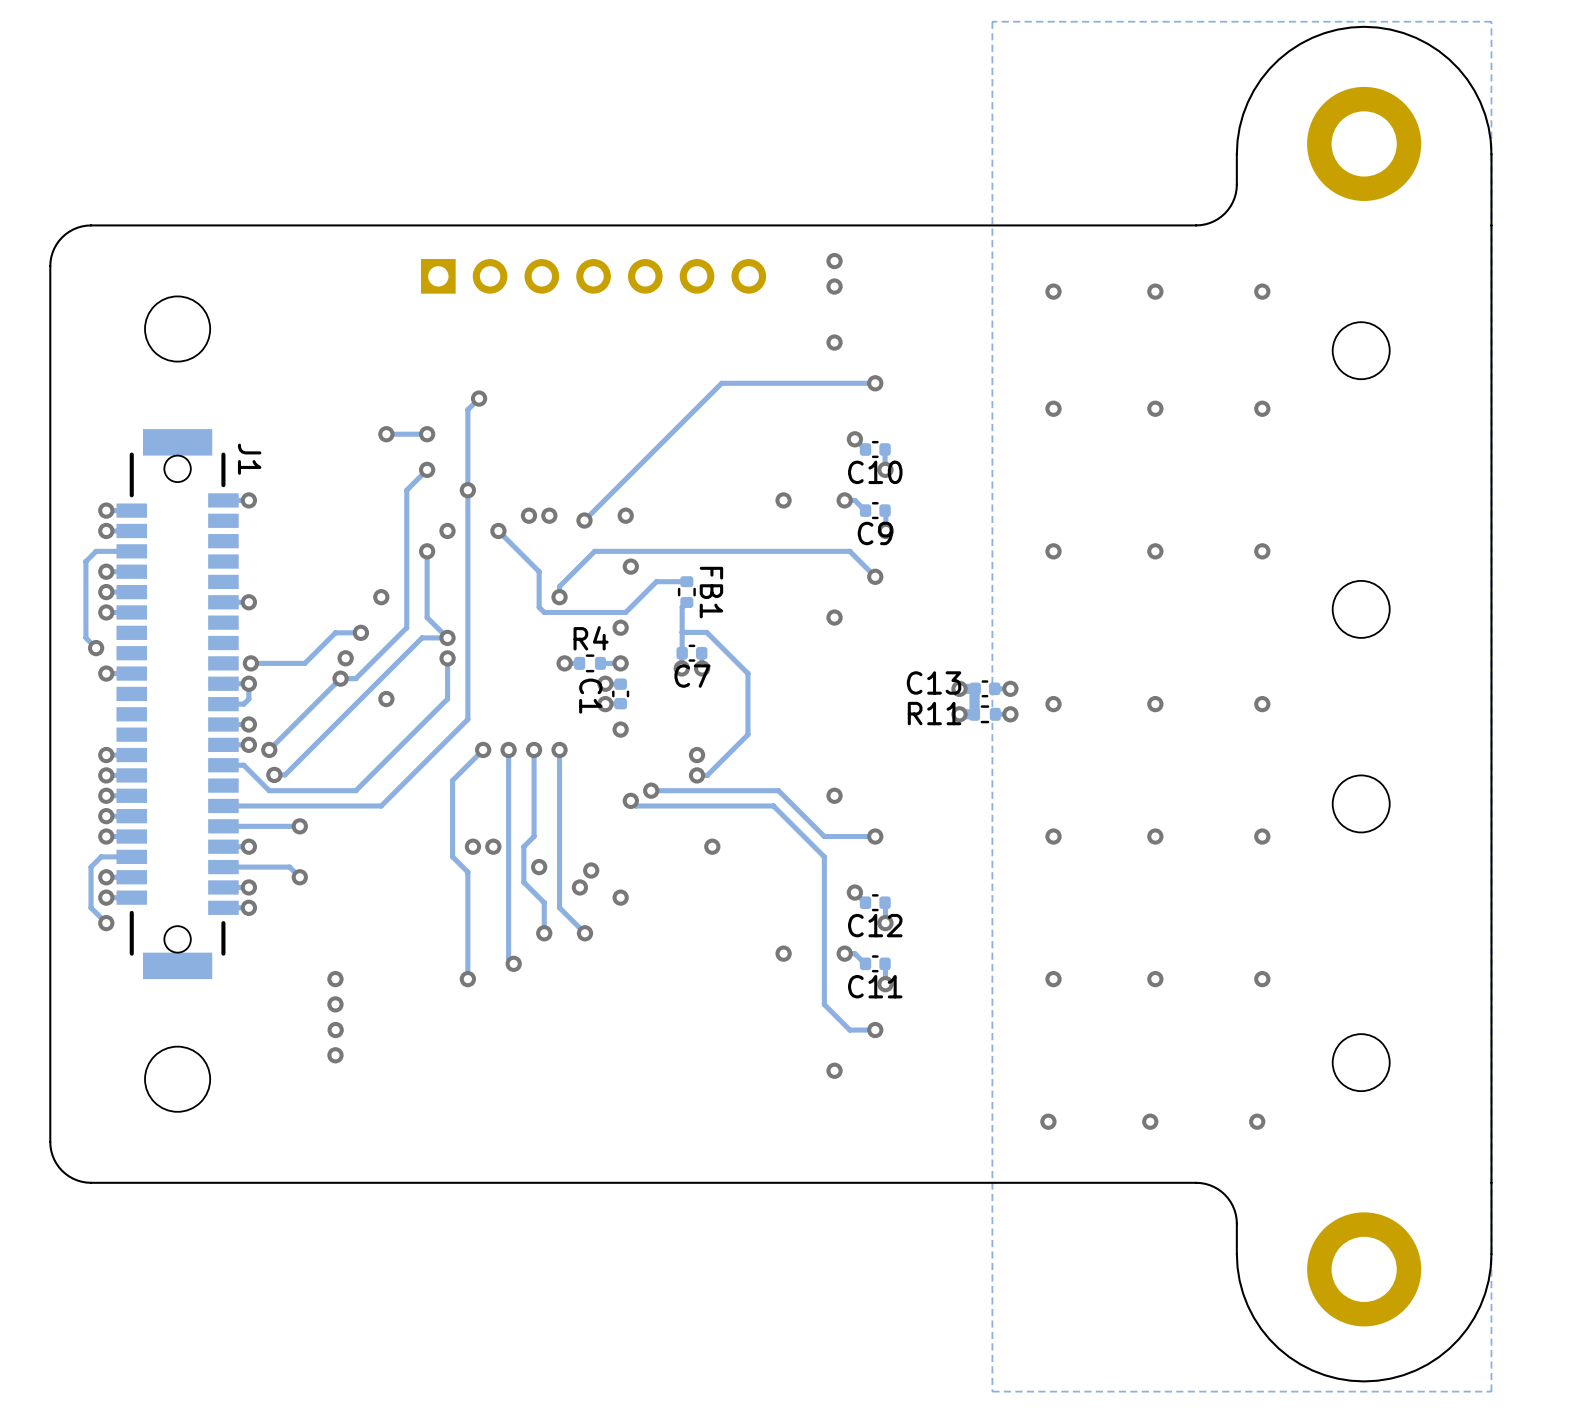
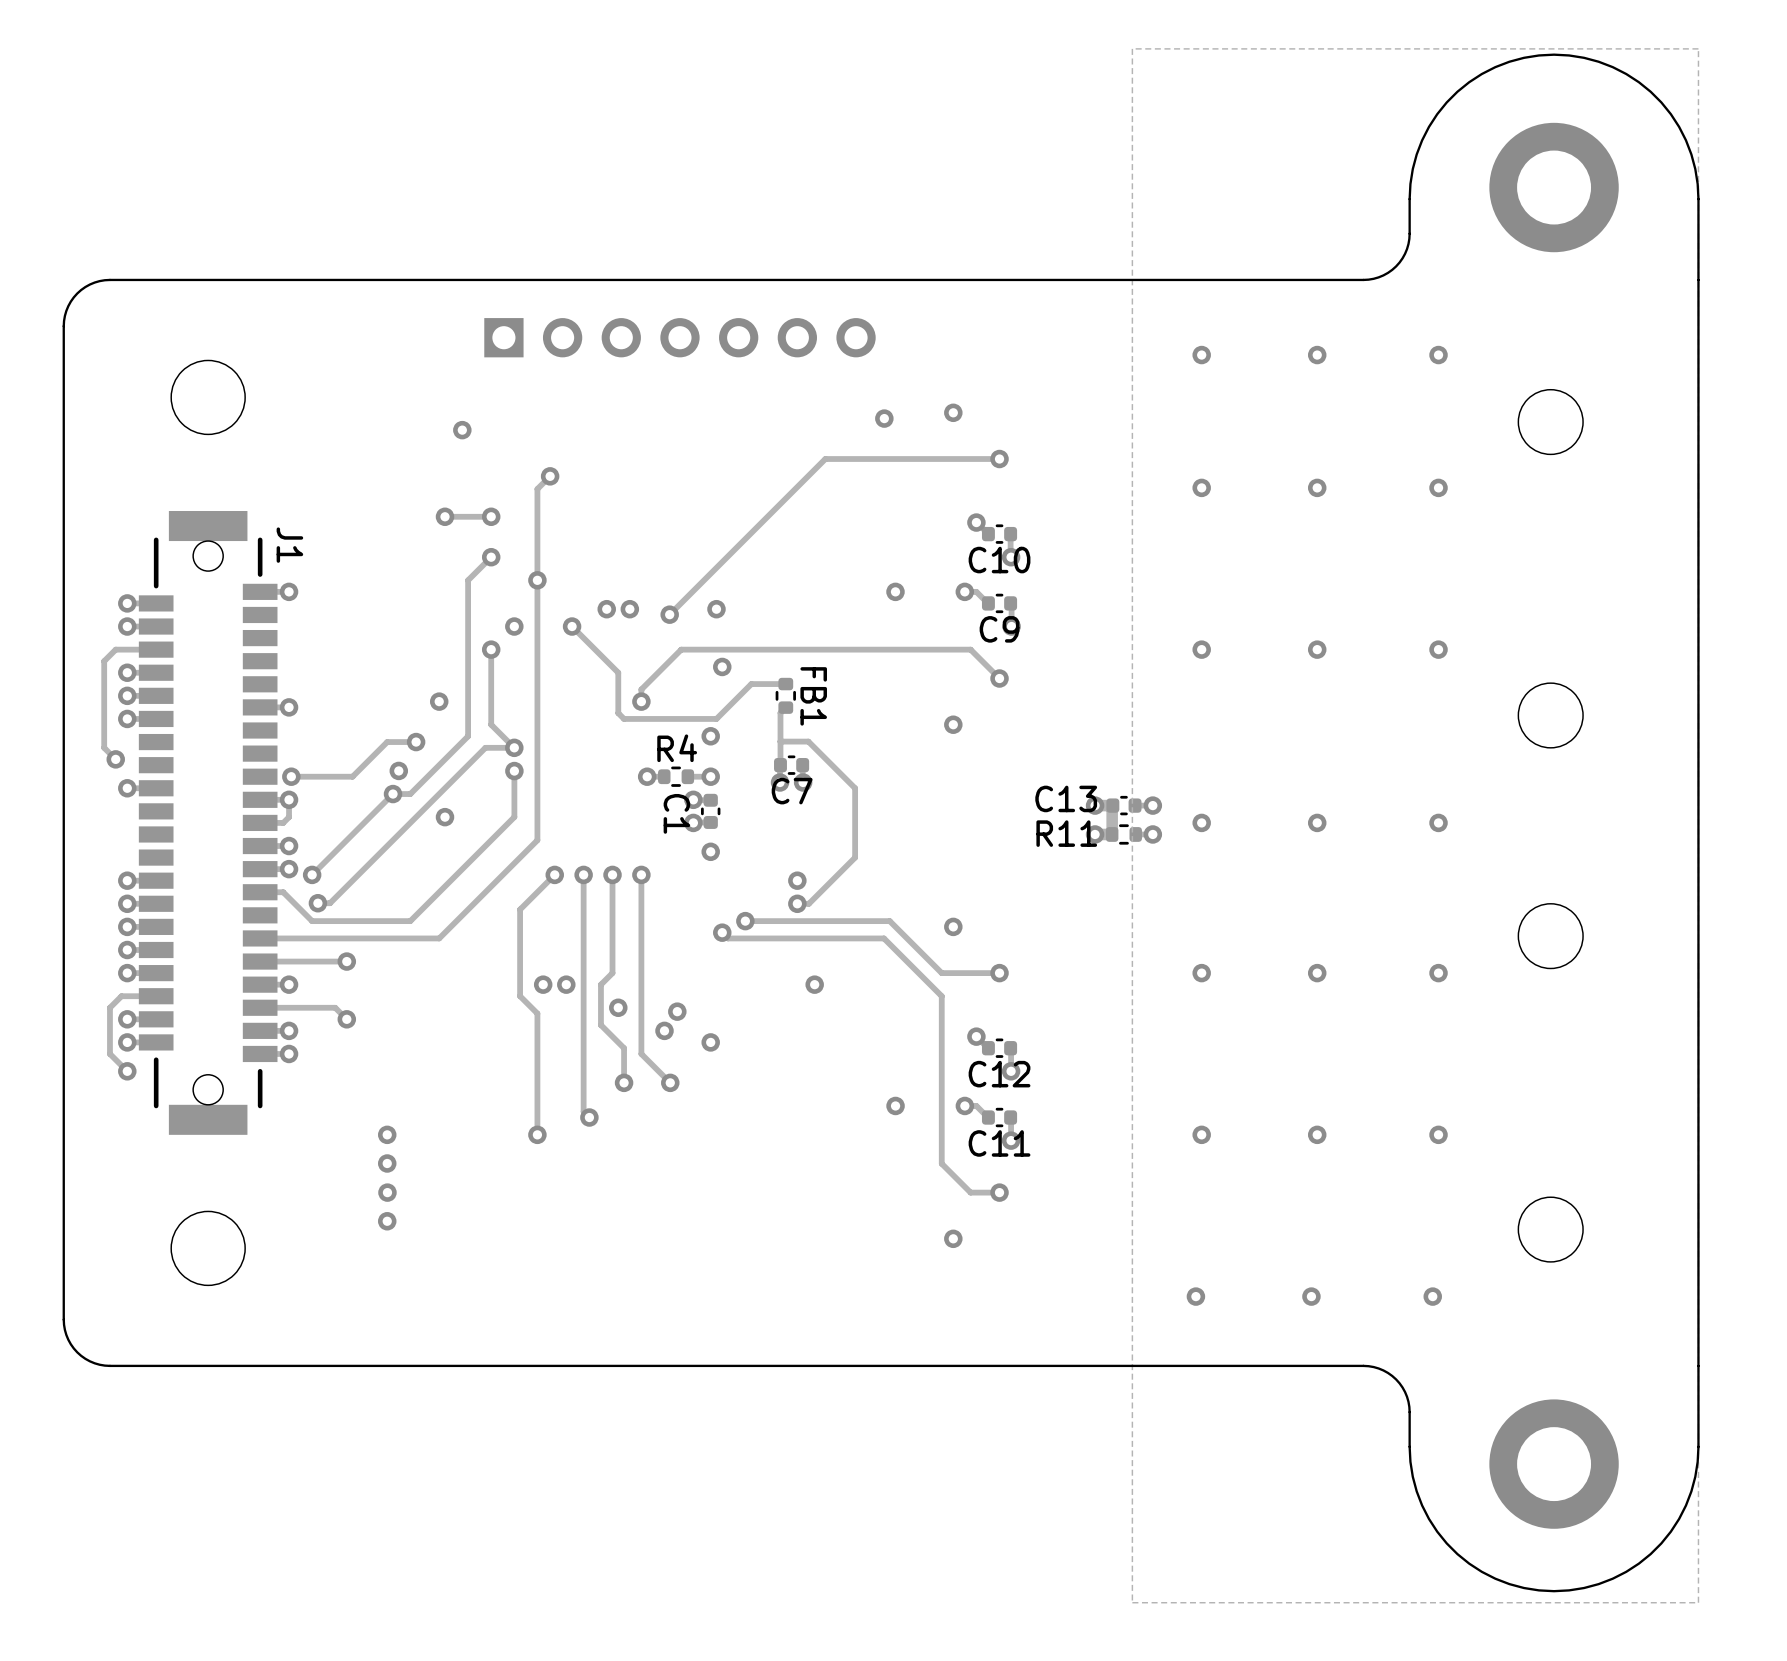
via: (834, 261) -> none
via: (834, 286) -> none
via: none -> (884, 418)
via: none -> (462, 430)

